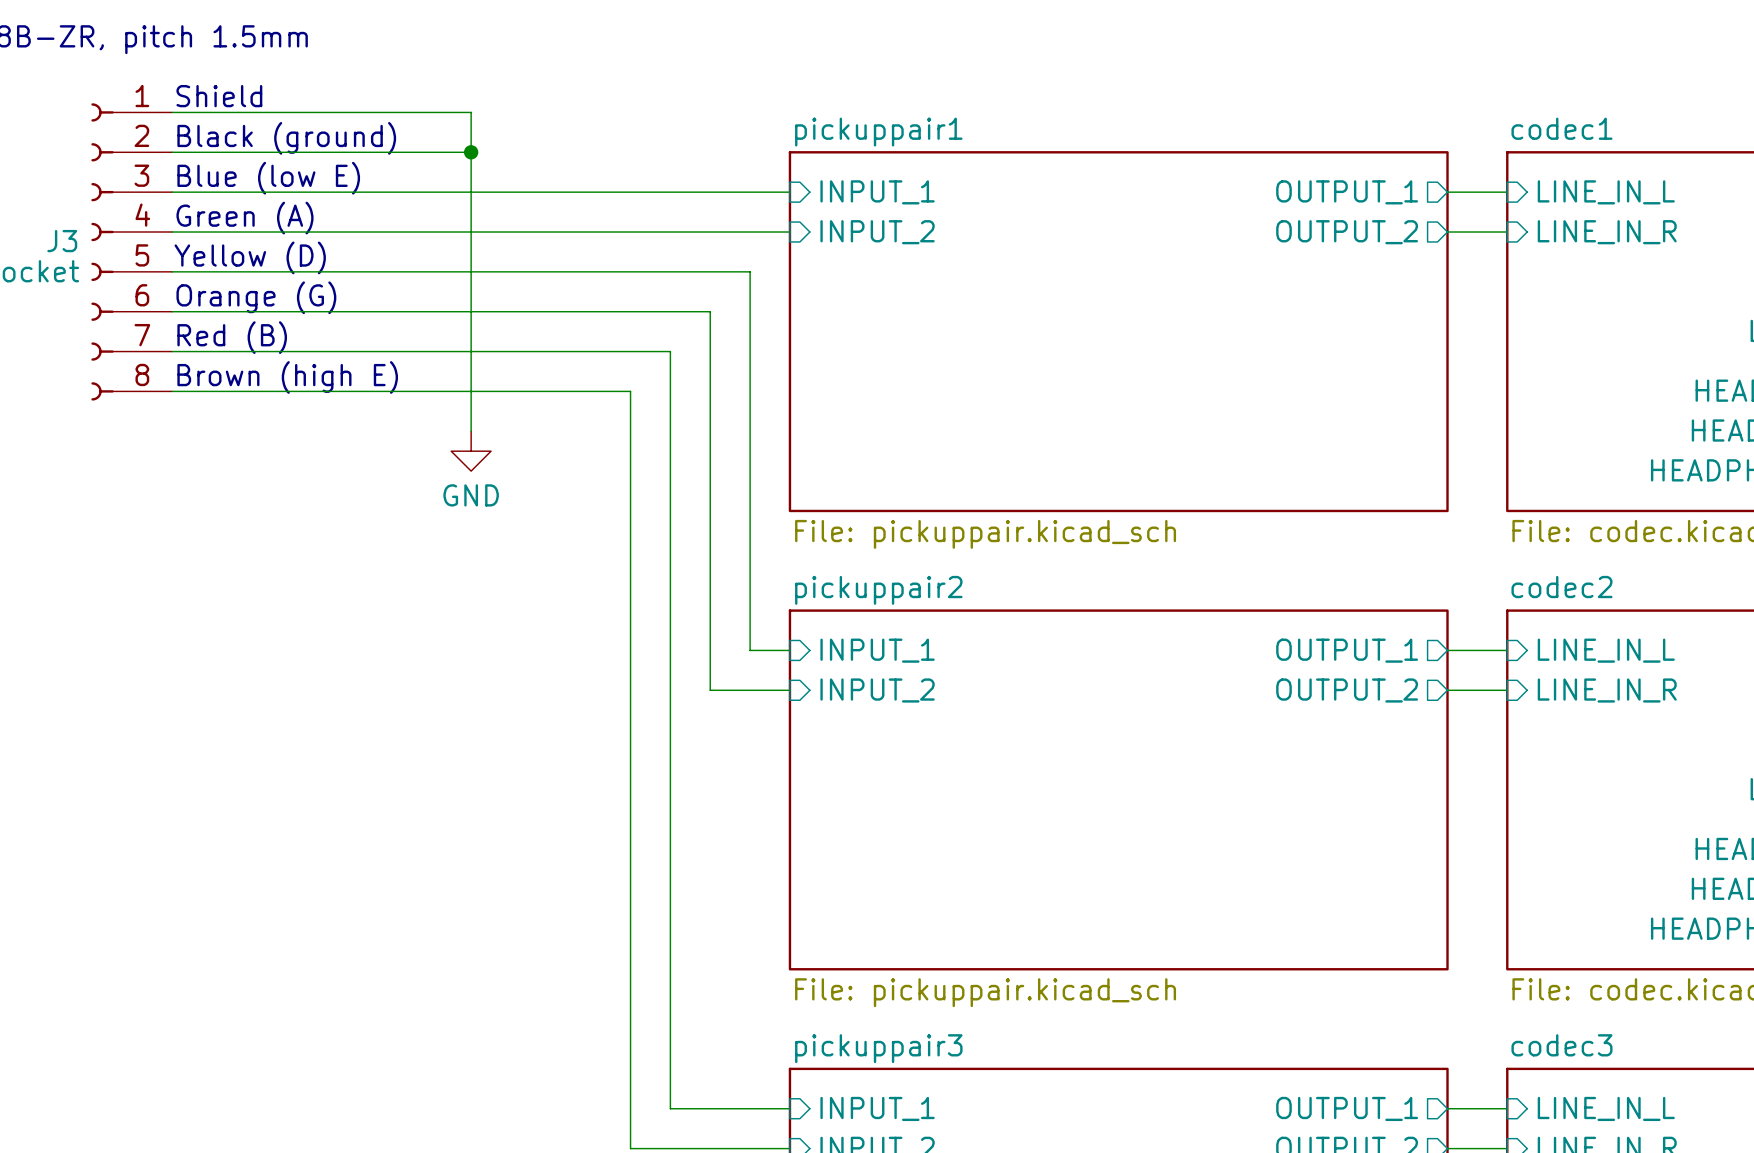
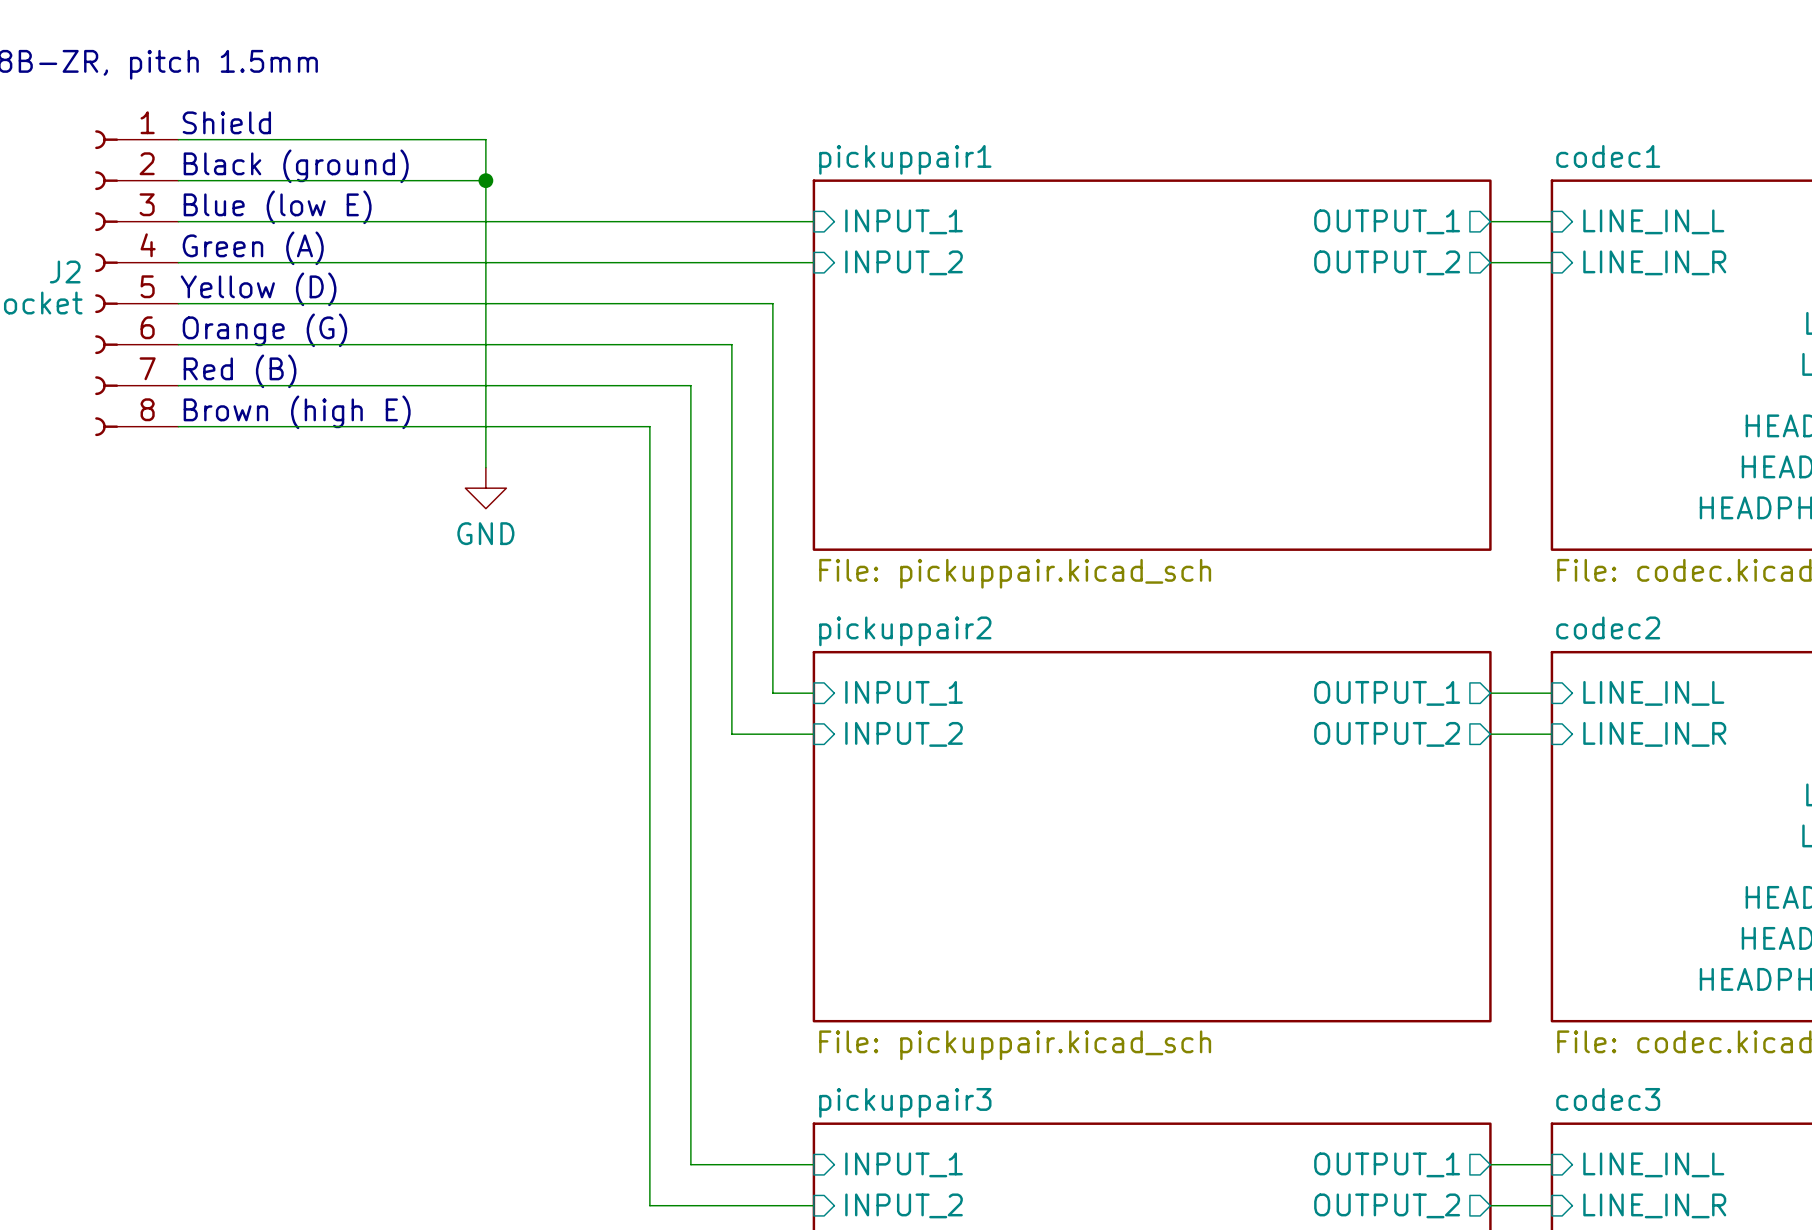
J3 name: J3 (62, 241) -> J2 (65, 272)

